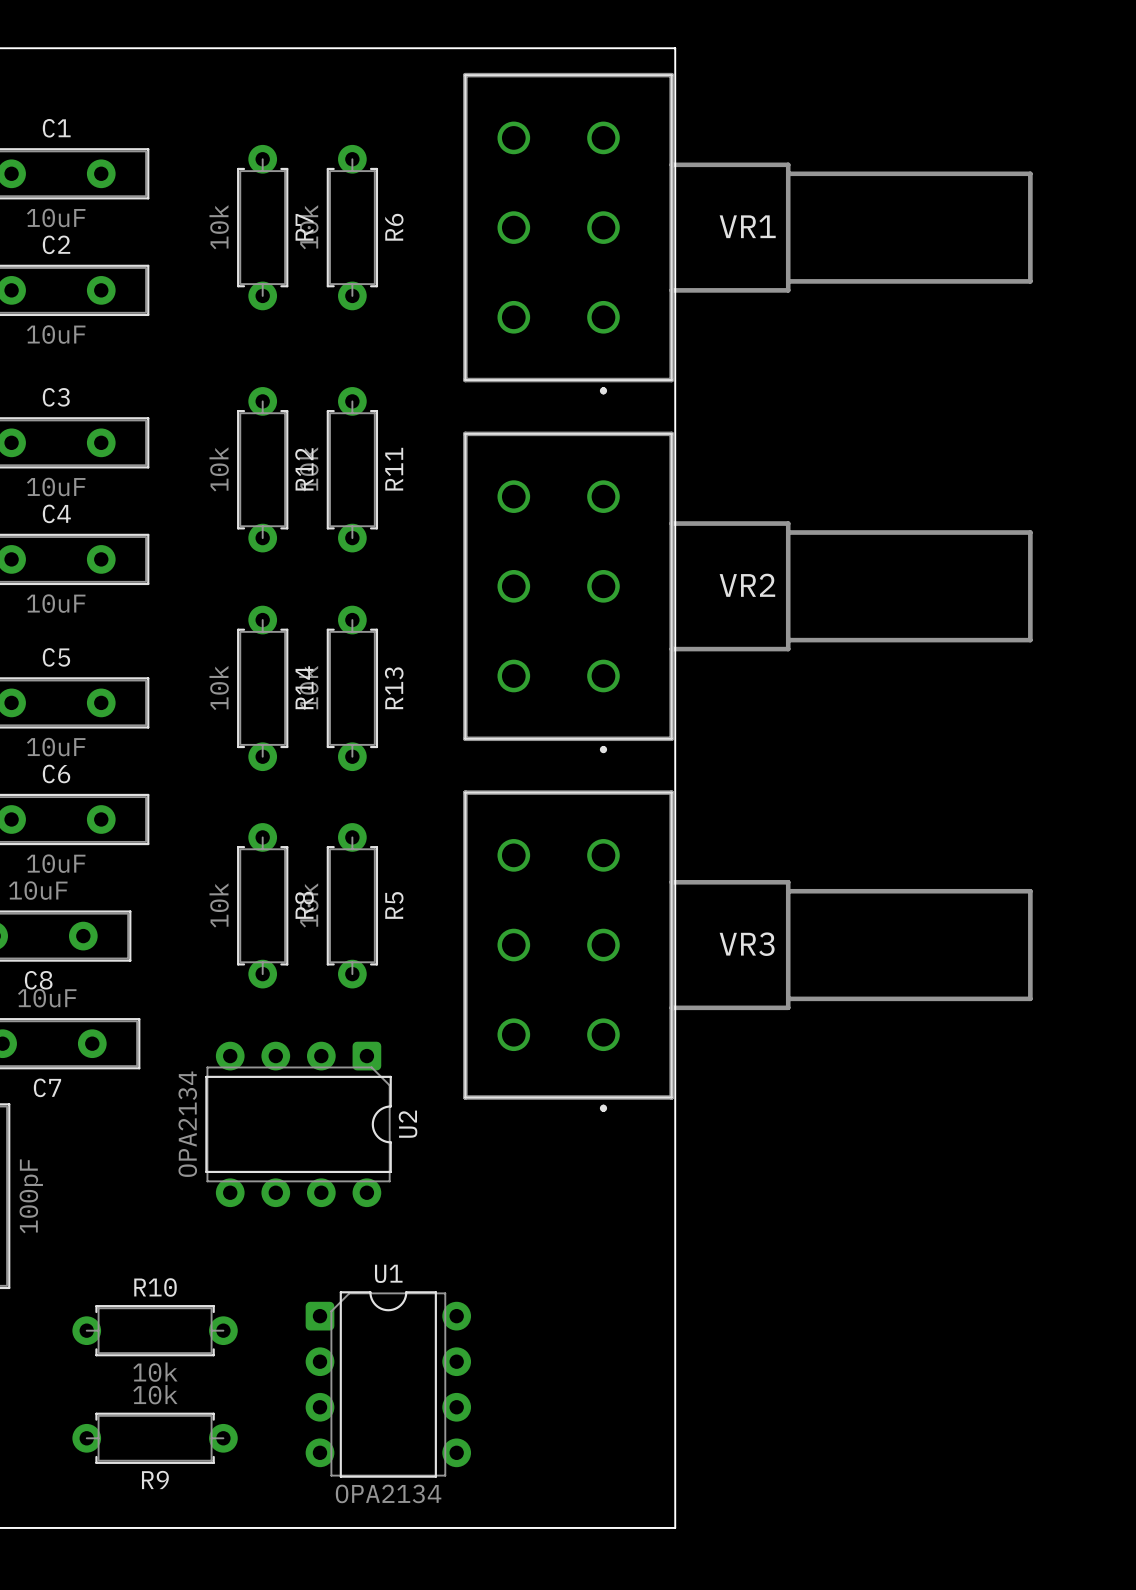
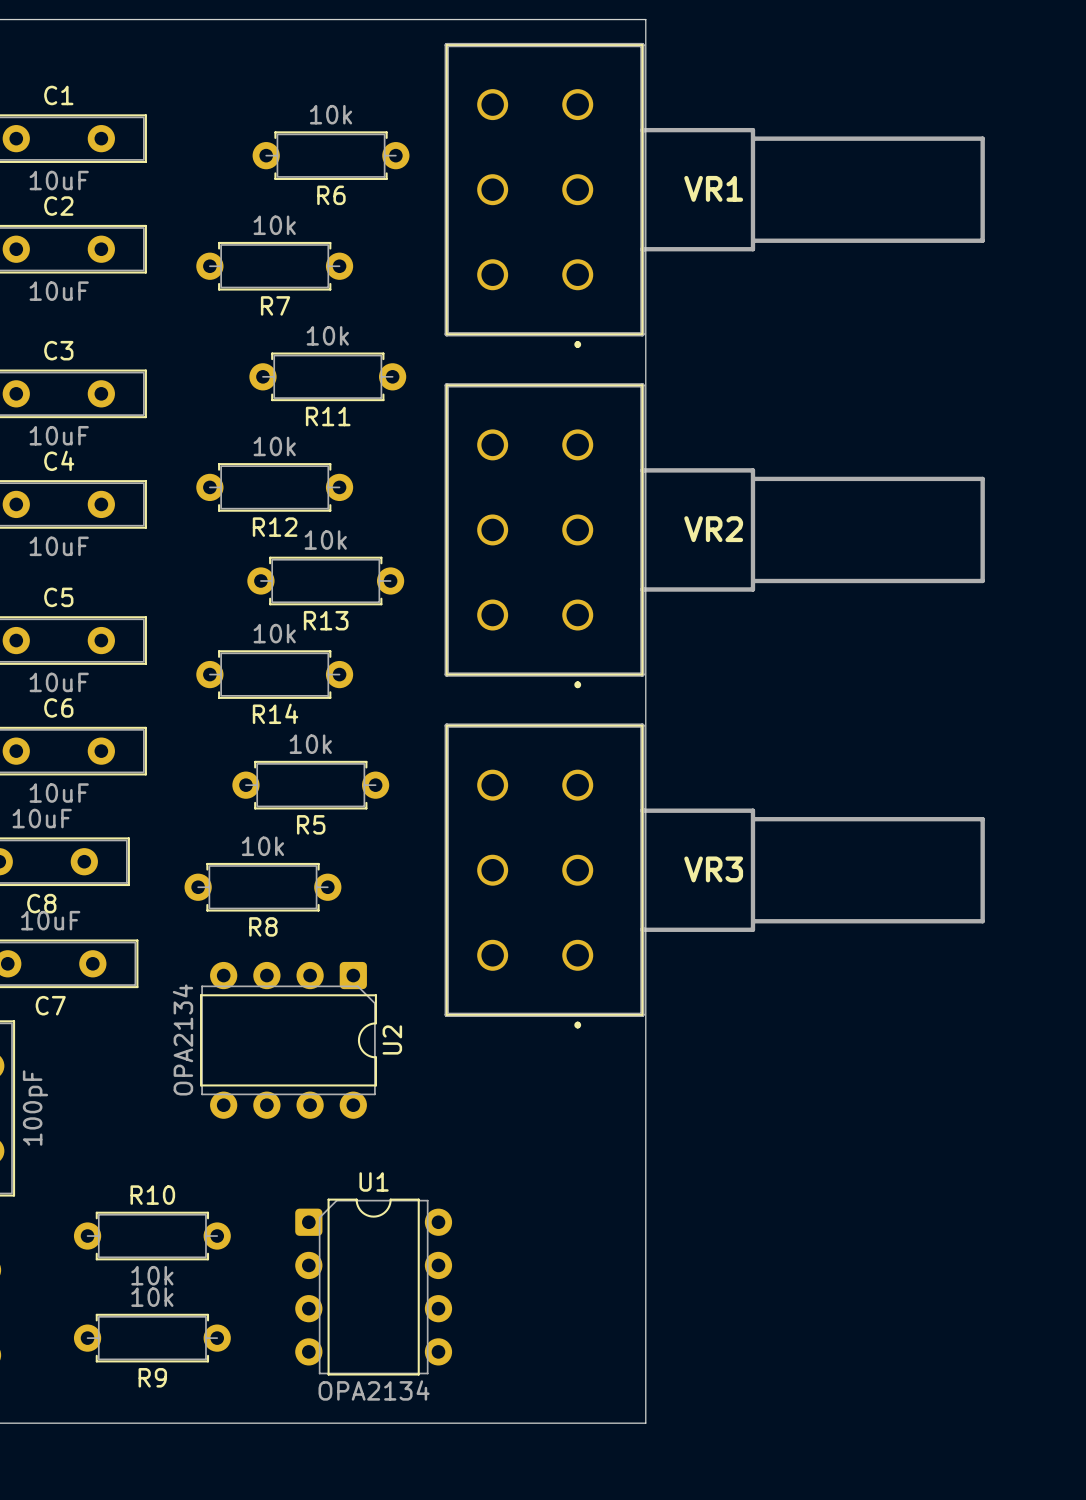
R7 rotation: 0° (262, 227) -> 90° clockwise (274, 266)
R6 rotation: 0° (352, 227) -> 90° clockwise (331, 155)
R12 rotation: 0° (262, 469) -> 90° clockwise (274, 487)
R11 rotation: 0° (352, 469) -> 90° clockwise (327, 376)
R14 rotation: 0° (262, 688) -> 90° clockwise (274, 674)
R13 rotation: 0° (352, 688) -> 90° clockwise (325, 580)
R8 rotation: 0° (262, 905) -> 90° clockwise (262, 887)
R5 rotation: 0° (352, 905) -> 90° clockwise (310, 785)

